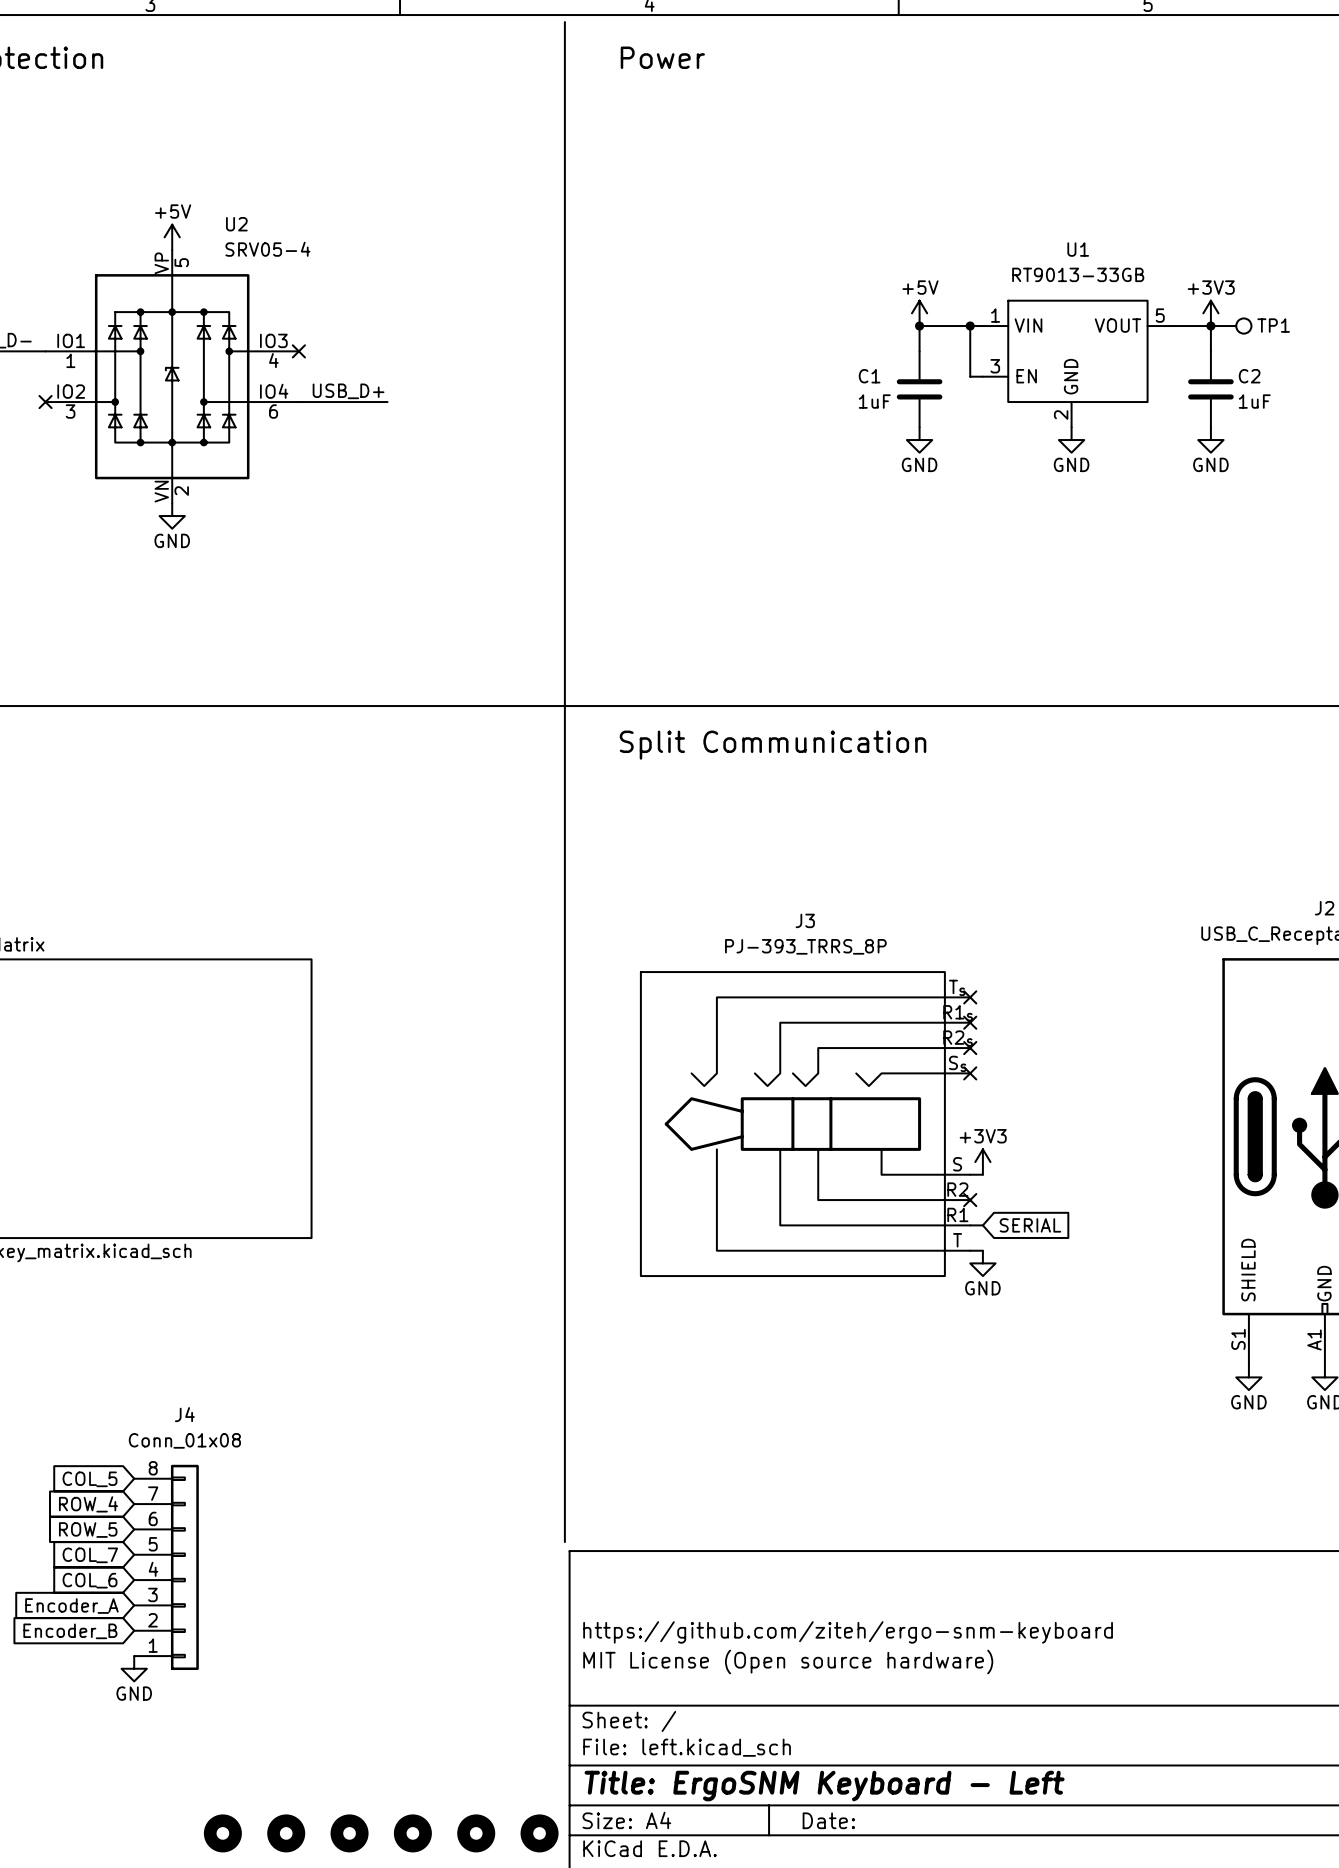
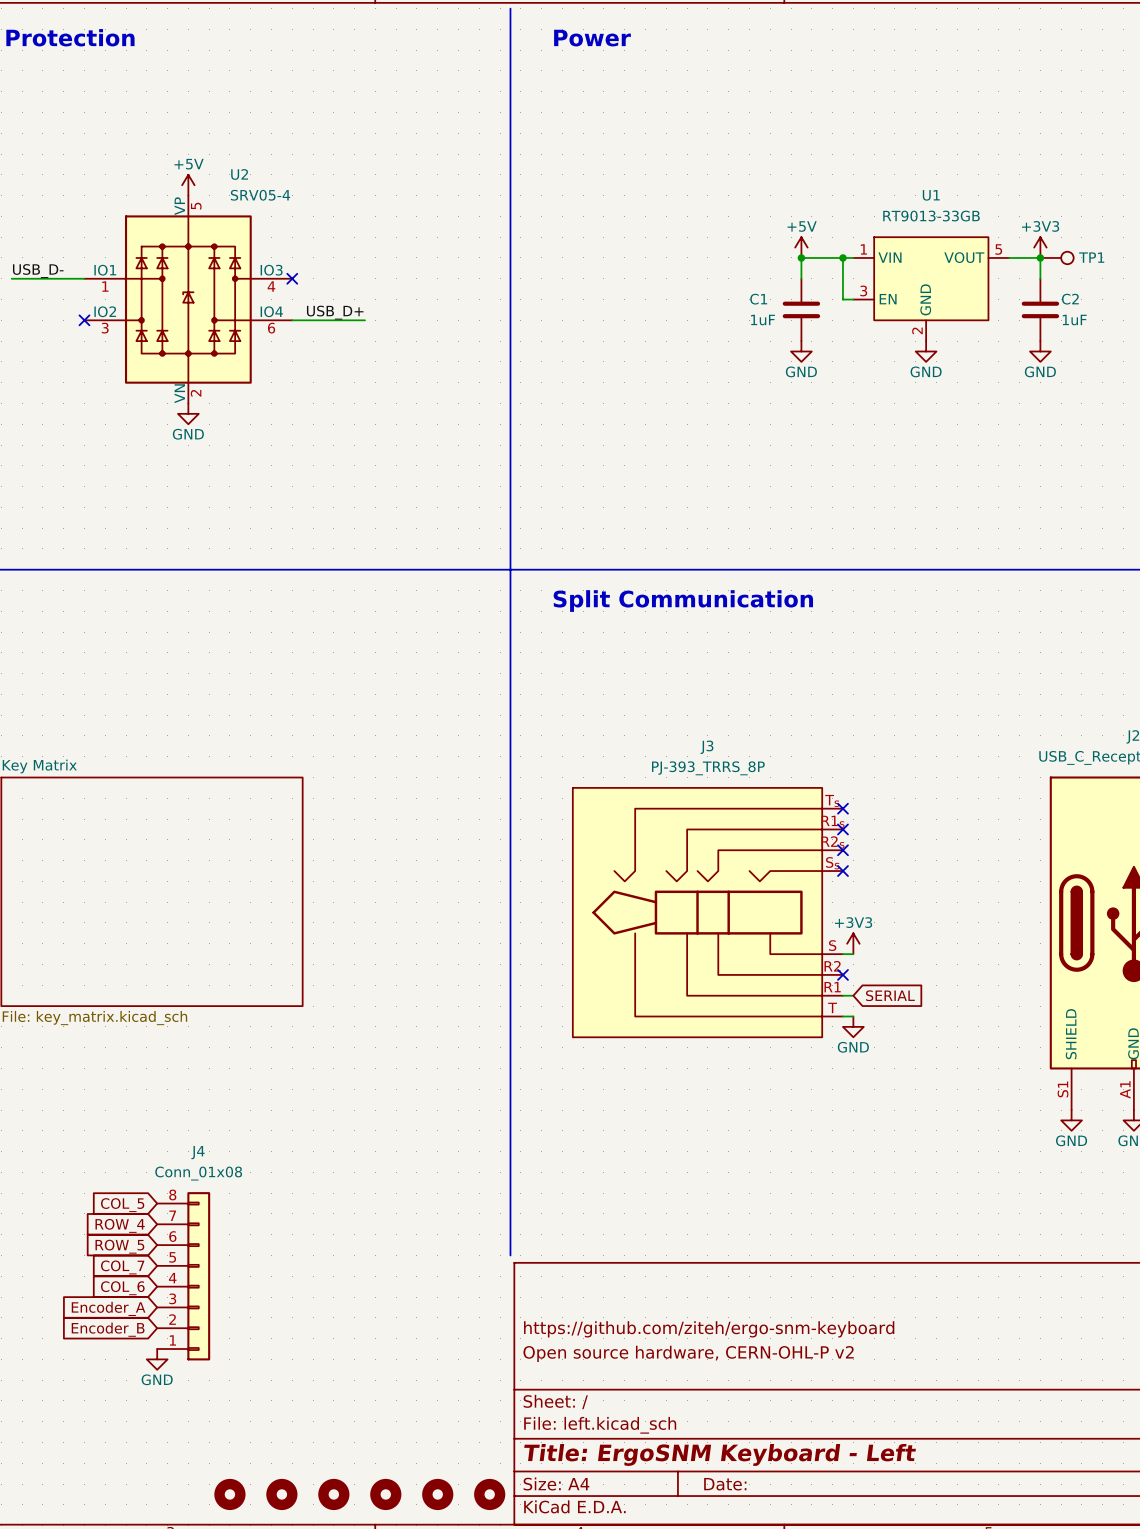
title block: MIT License (Open source hardware) (788, 1661) -> Open source hardware, CERN-OHL-P v2 (688, 1353)

